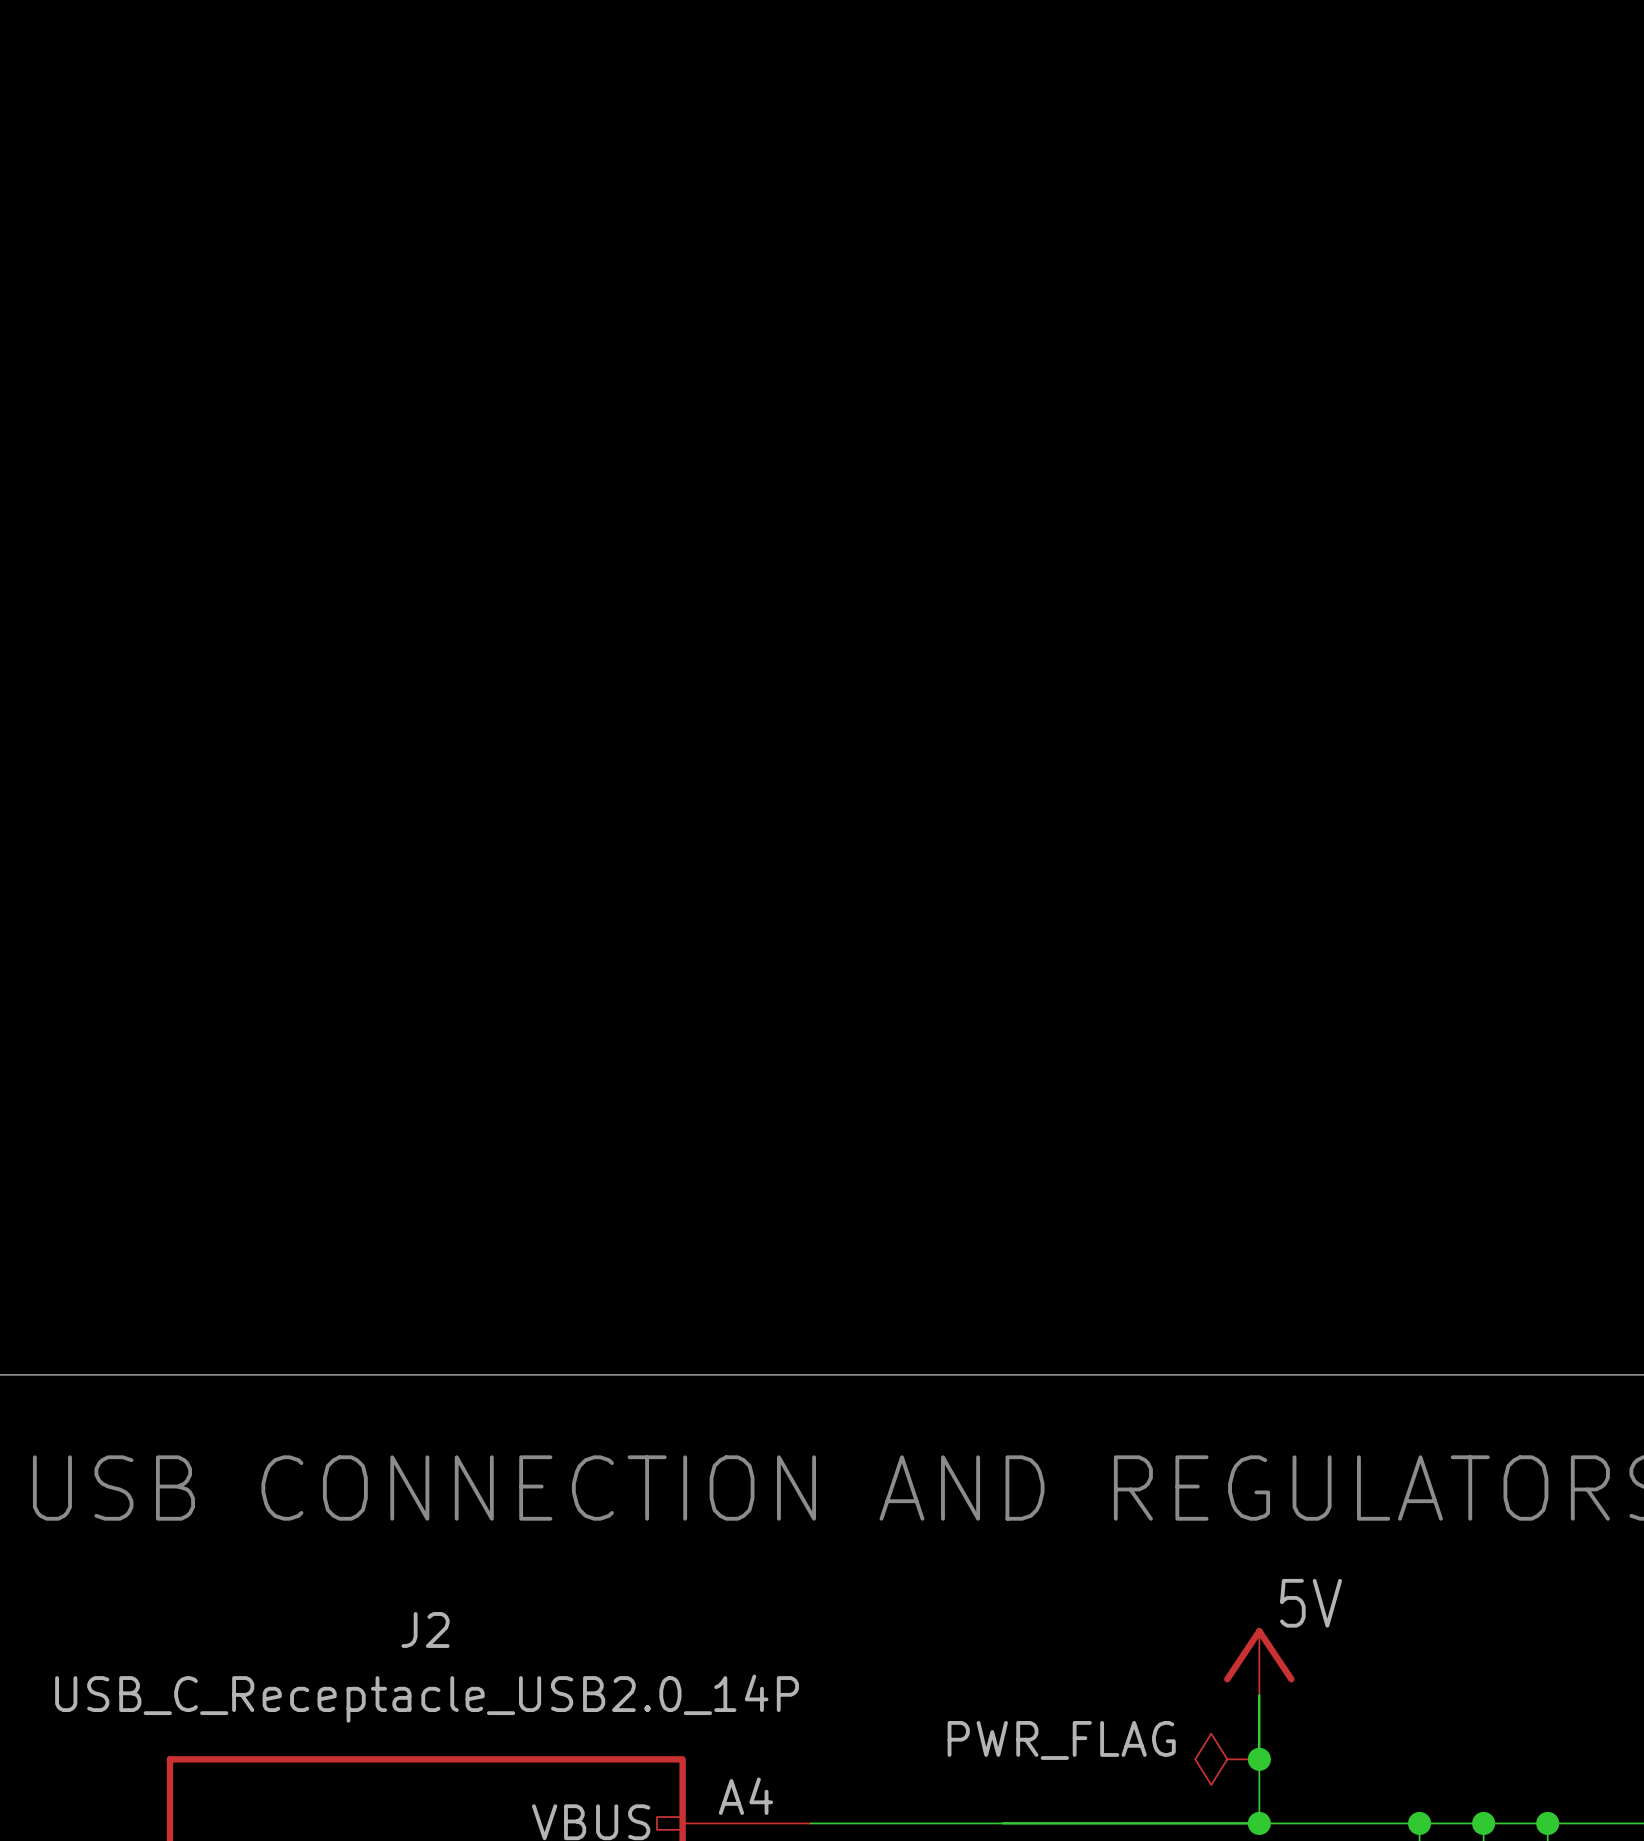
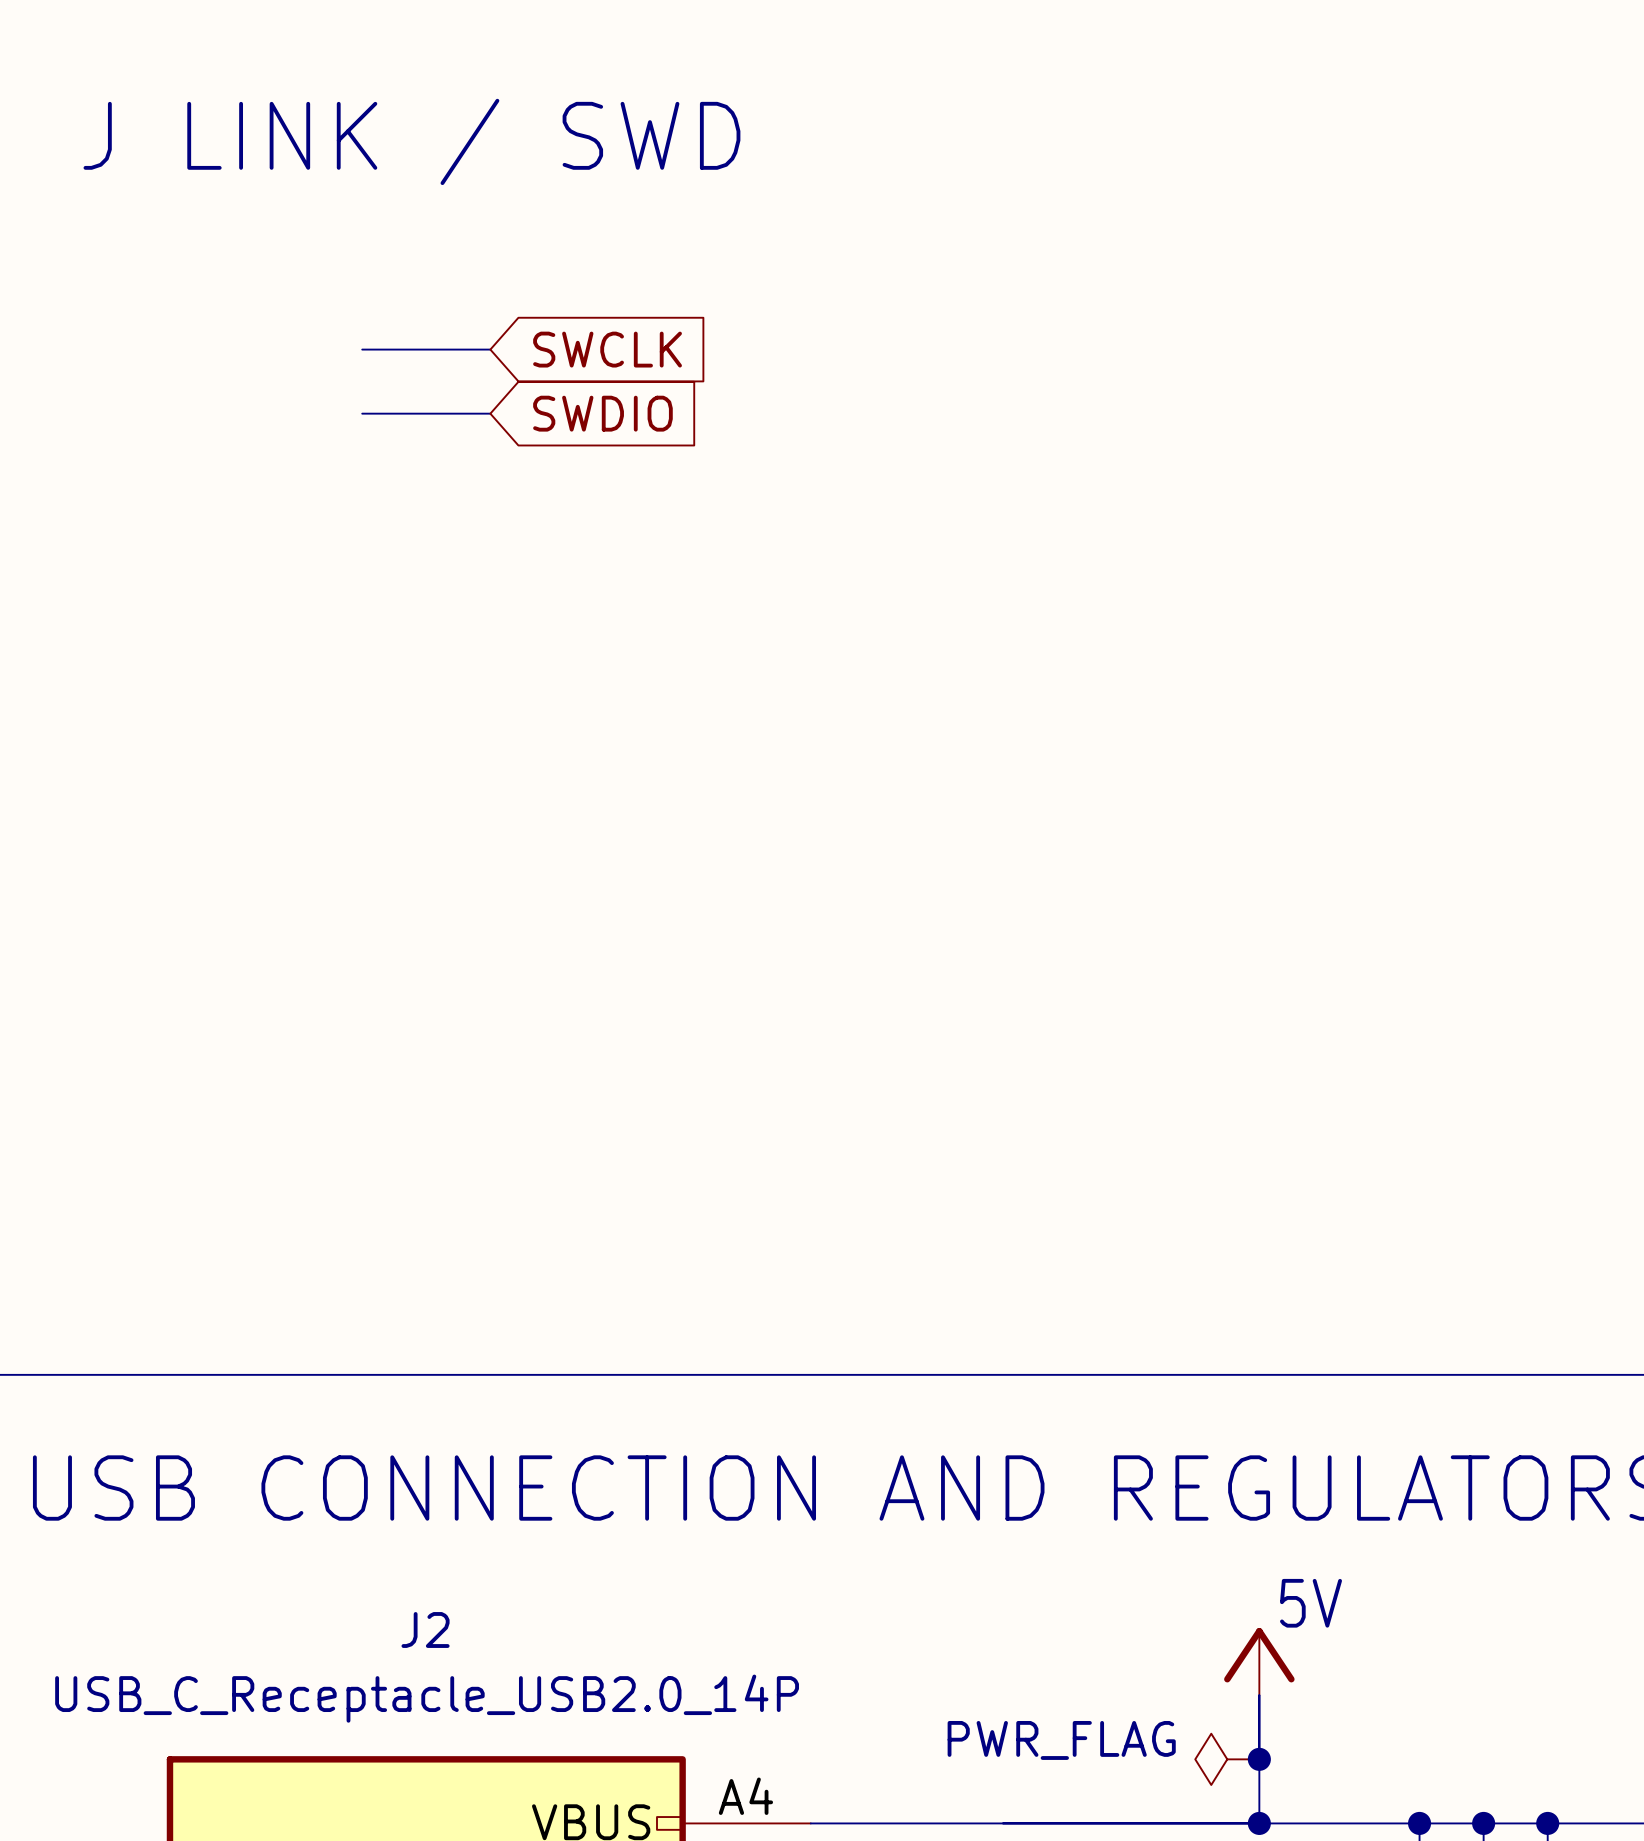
text: none -> J LINK / SWD (411, 141)
wire: none -> (362, 349) (490, 349)
global label: none -> SWCLK (607, 349)
wire: none -> (362, 413) (490, 413)
global label: none -> SWDIO (602, 413)

